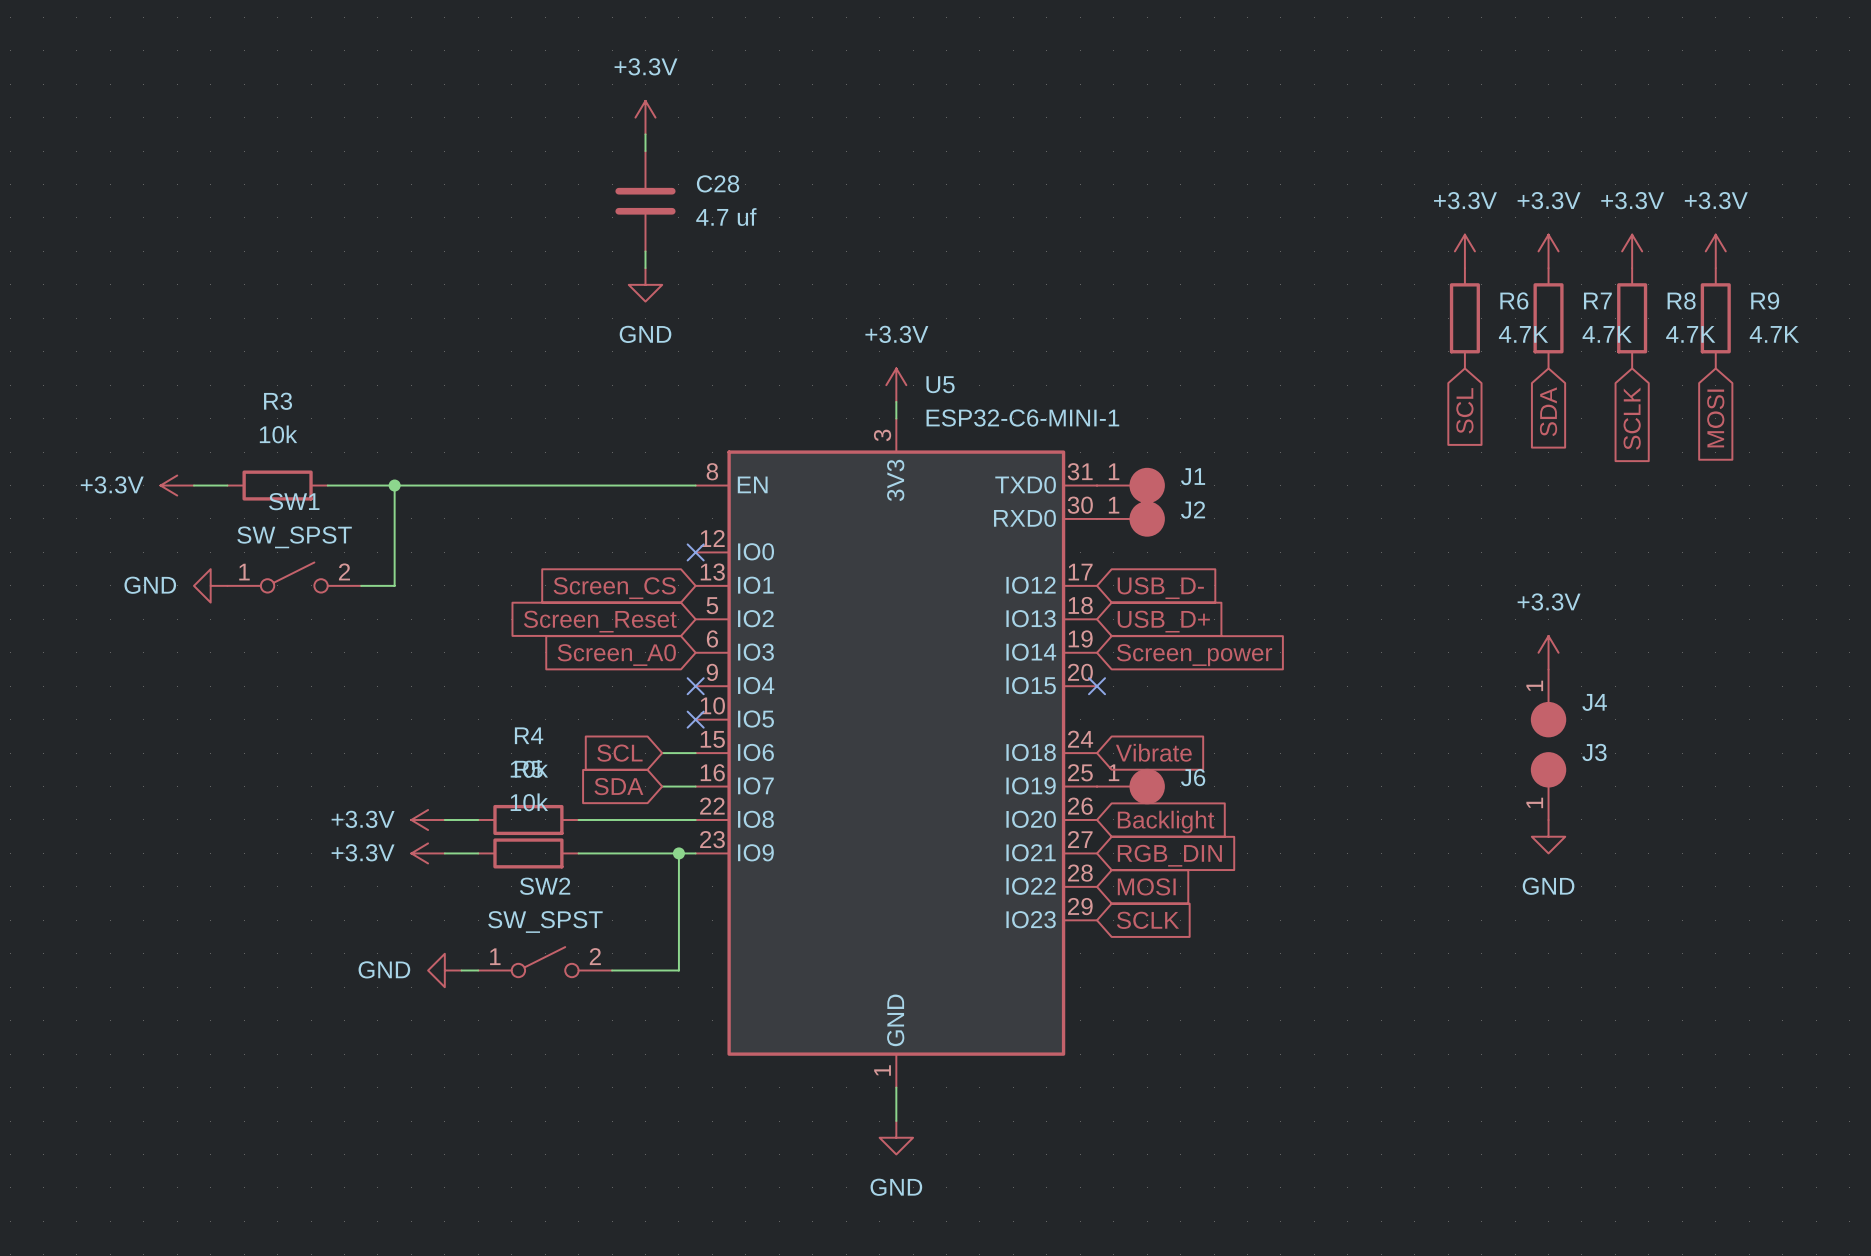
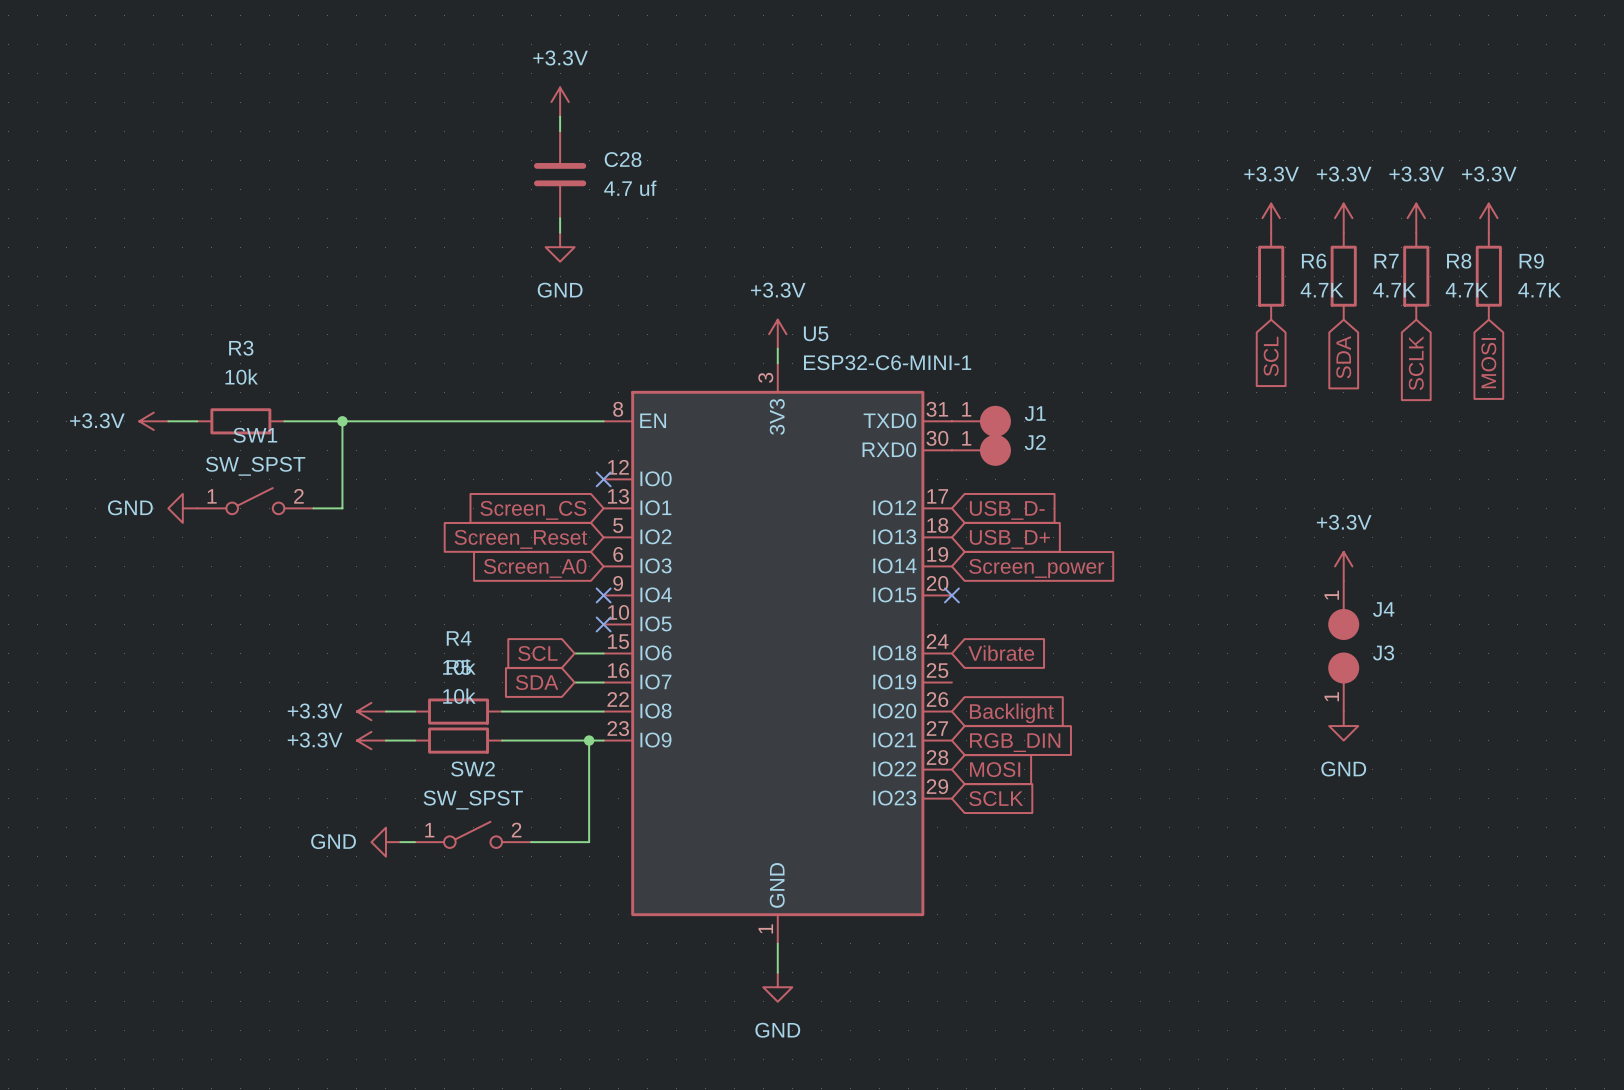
J6: (1130, 786) -> none

